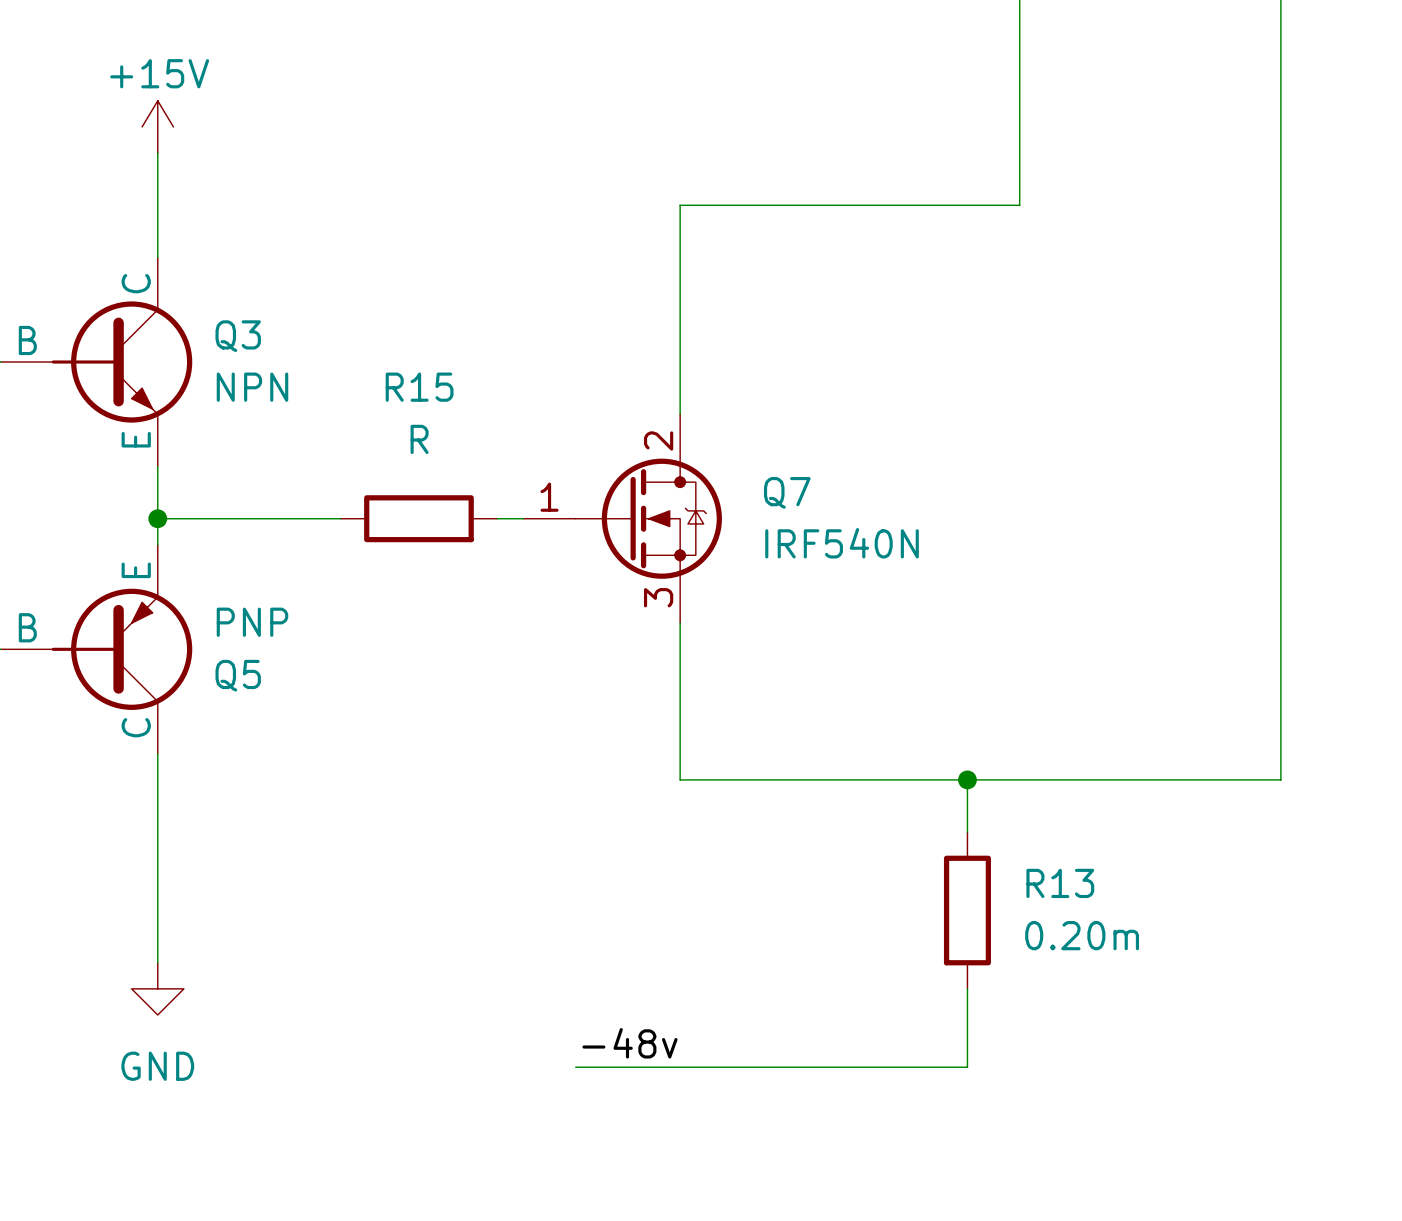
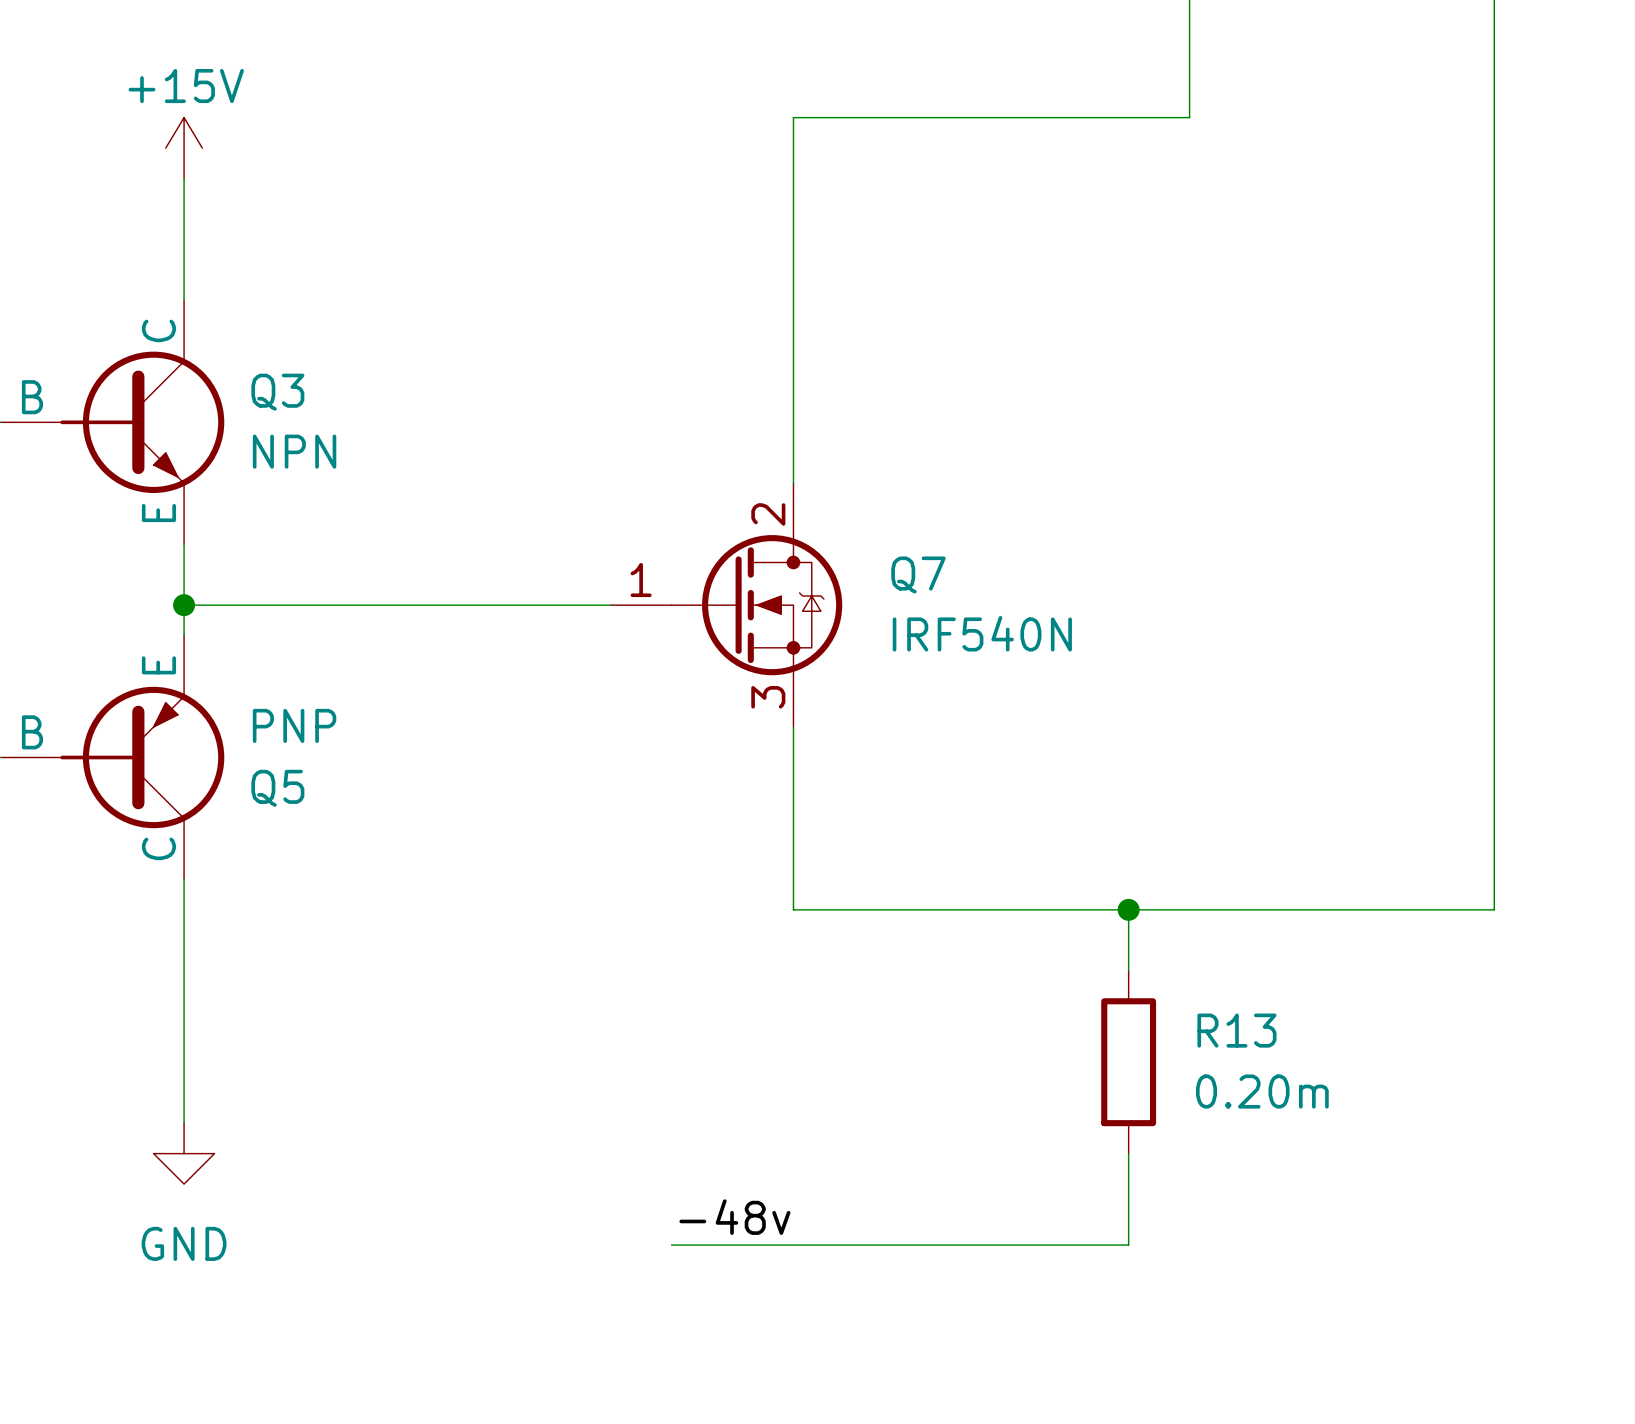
wire: (1019, 100) (1019, 205) (680, 205) -> (1189, 117) (793, 117) (793, 239)
wire: none -> (397, 605) (580, 605)
R15: R (418, 518) -> none

